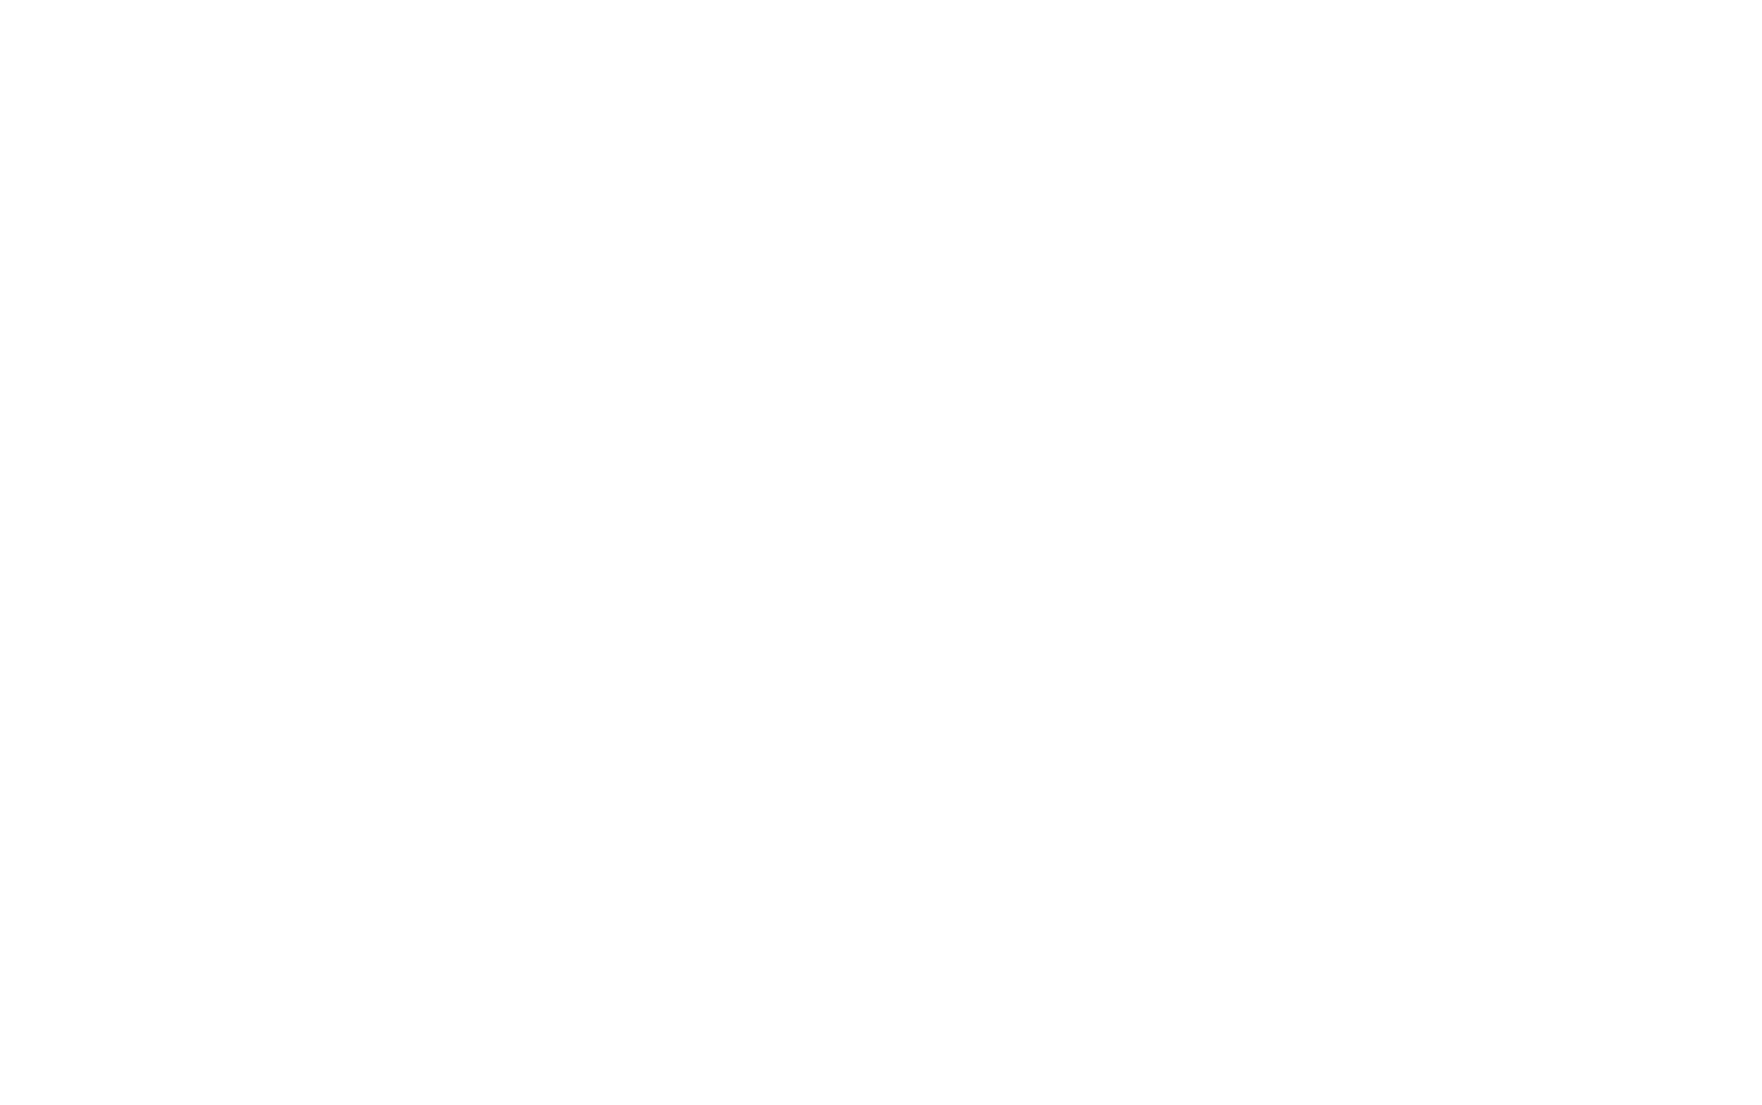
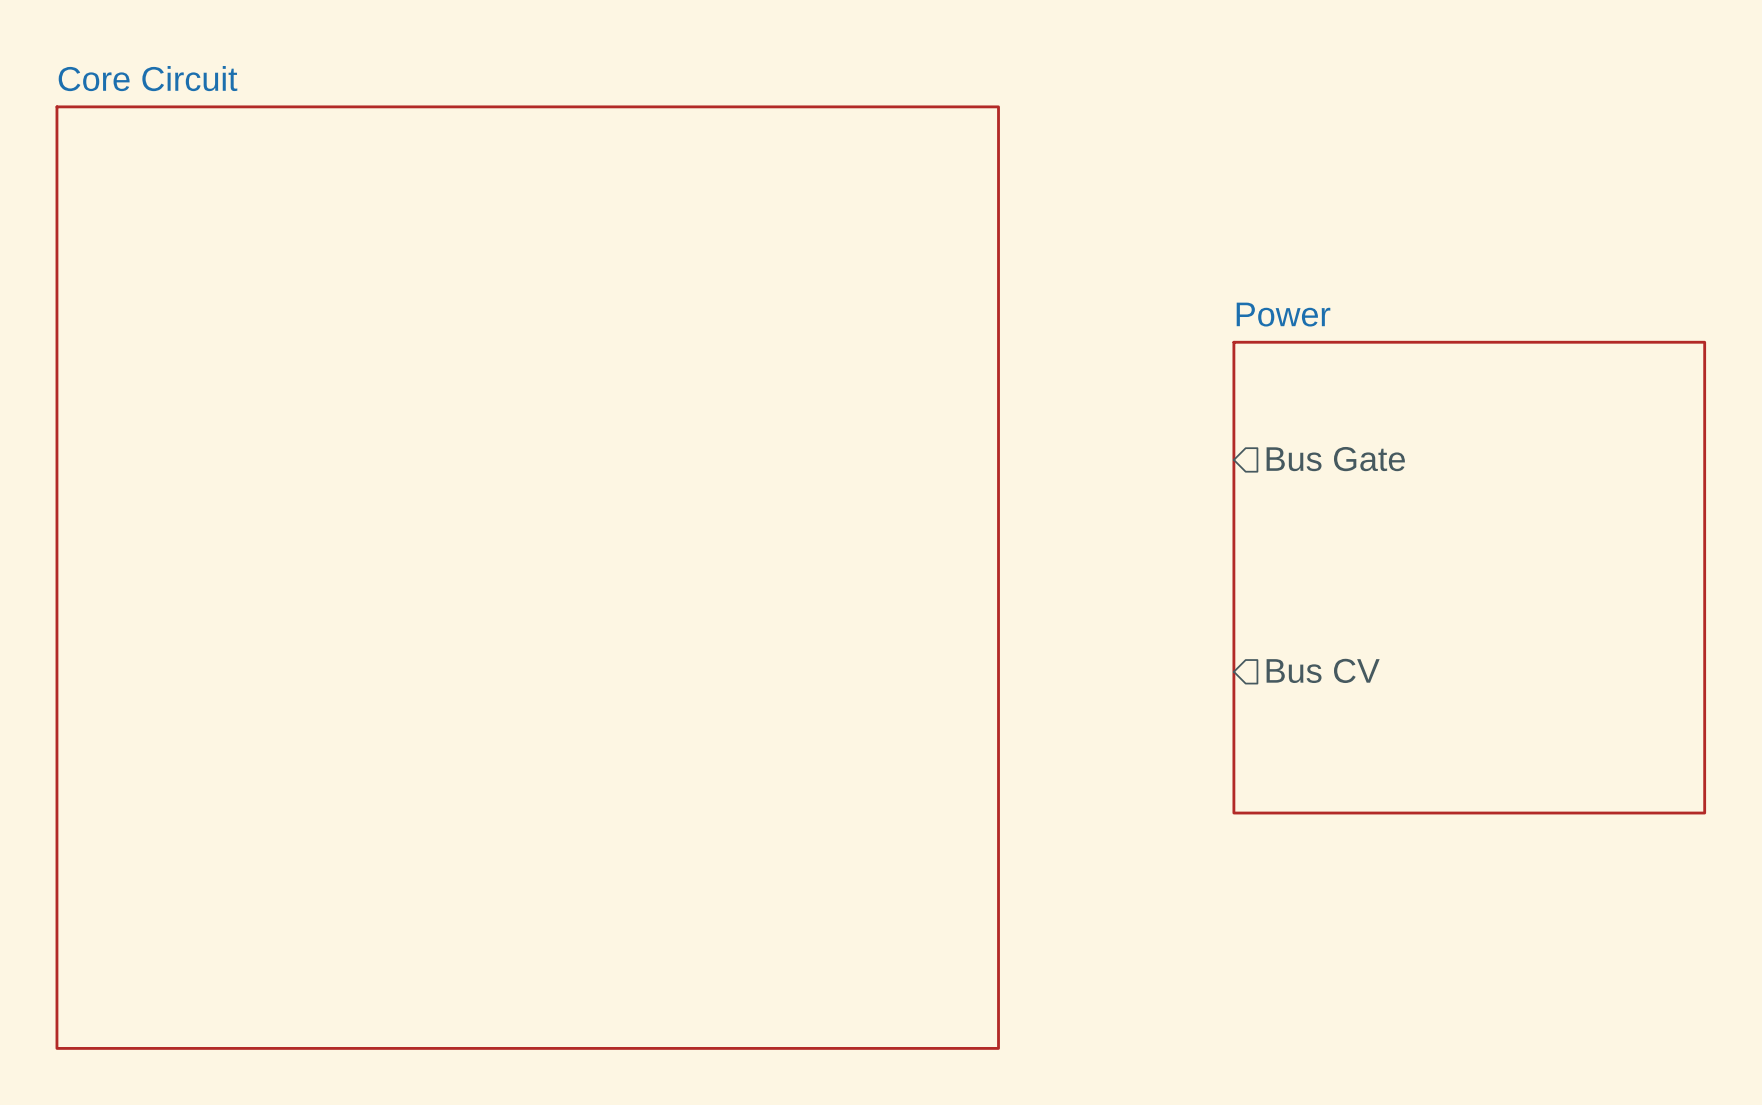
sheet pin: none -> Bus Gate (1335, 459)
sheet Core Circuit: none -> (527, 577)
sheet Power: none -> (1469, 577)
sheet pin: none -> Bus CV (1323, 670)

